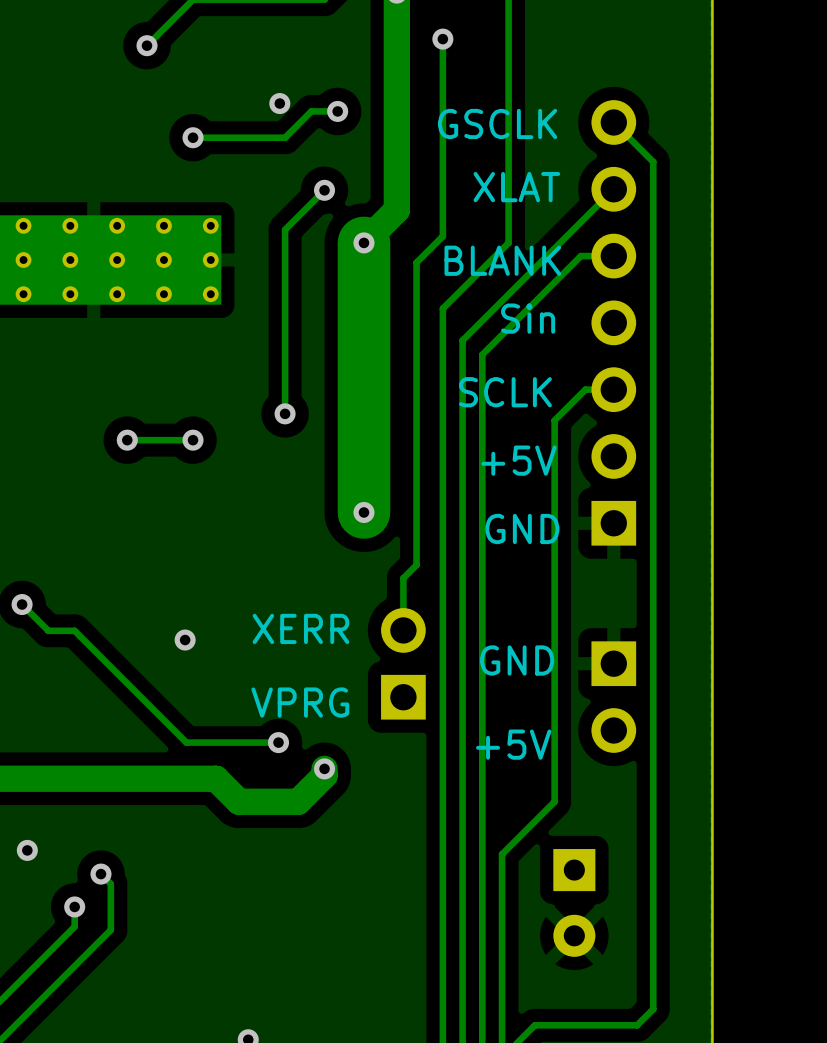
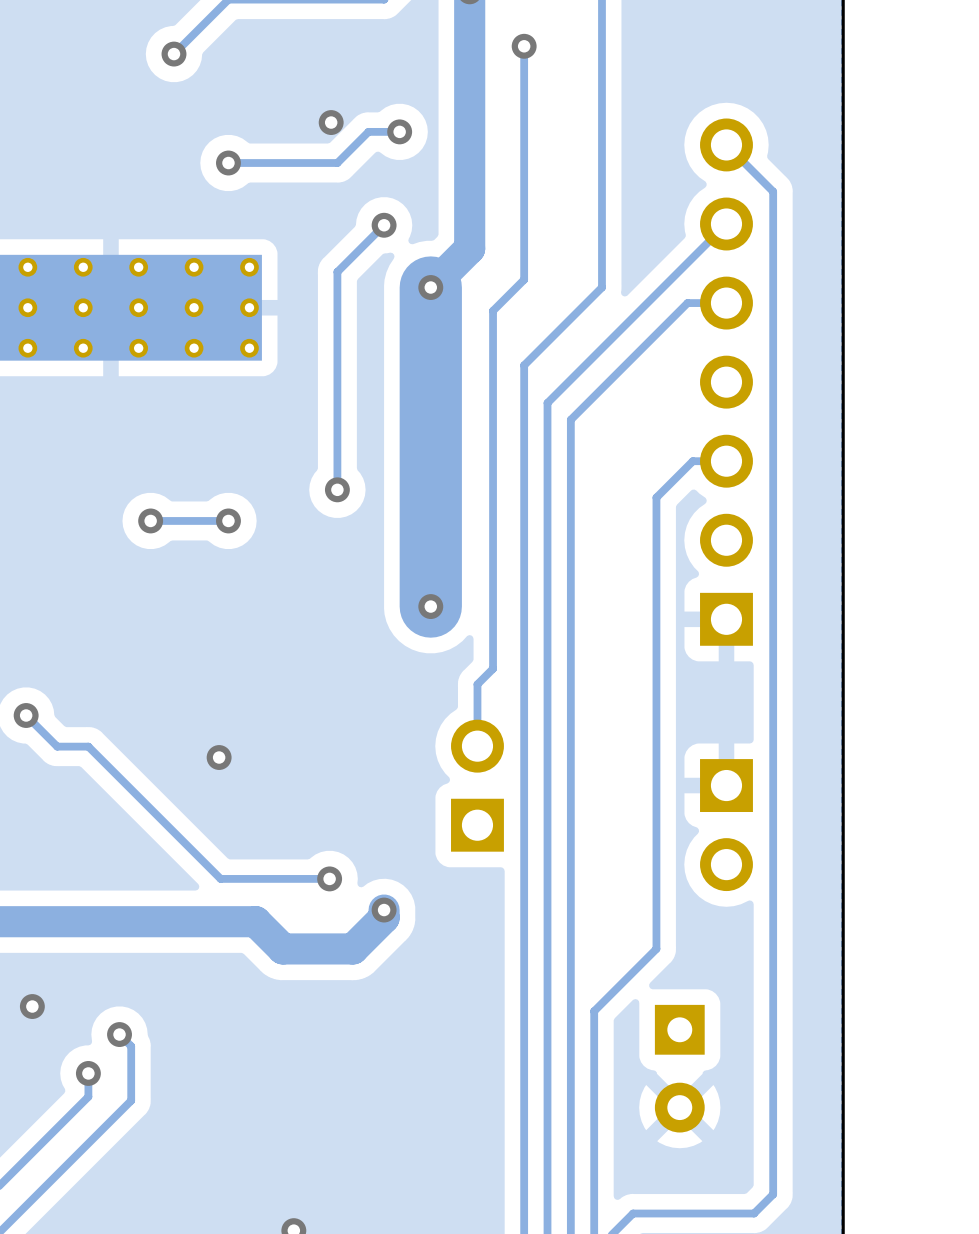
text: GSCLK (497, 123) -> none
text: XLAT (516, 187) -> none
text: BLANK (502, 260) -> none
text: Sin (528, 318) -> none
text: SCLK (505, 392) -> none
text: +5V (518, 460) -> none
text: GND (522, 528) -> none
text: XERR (300, 628) -> none
text: GND (517, 660) -> none
text: VPRG (300, 702) -> none
text: +5V (513, 744) -> none

